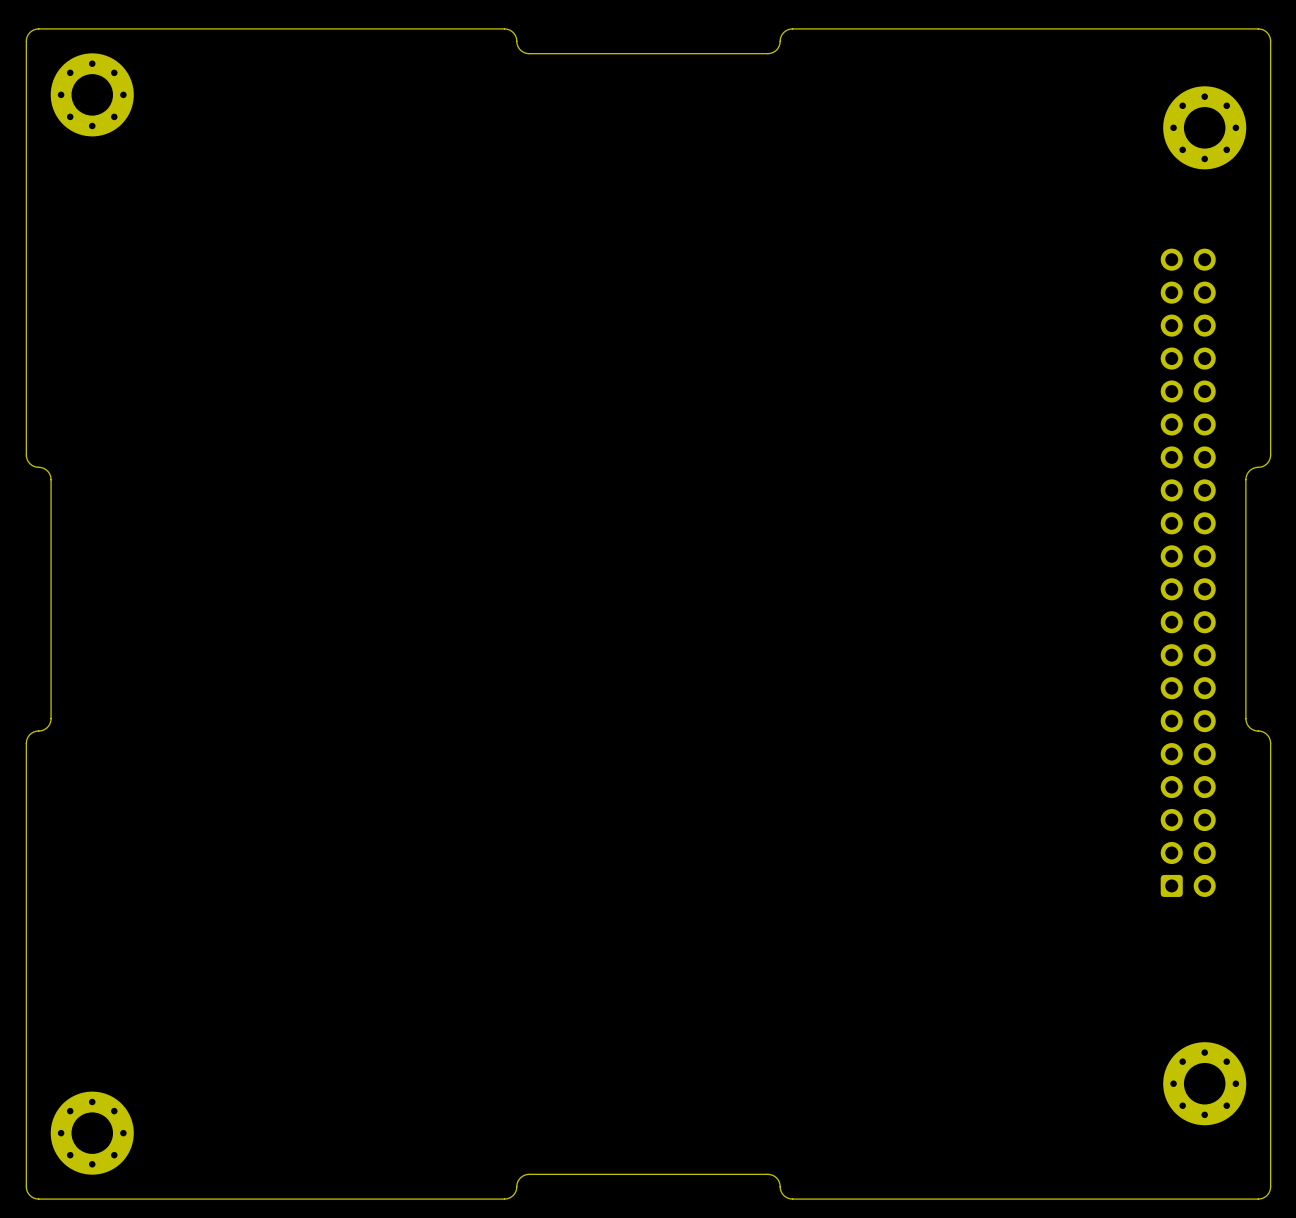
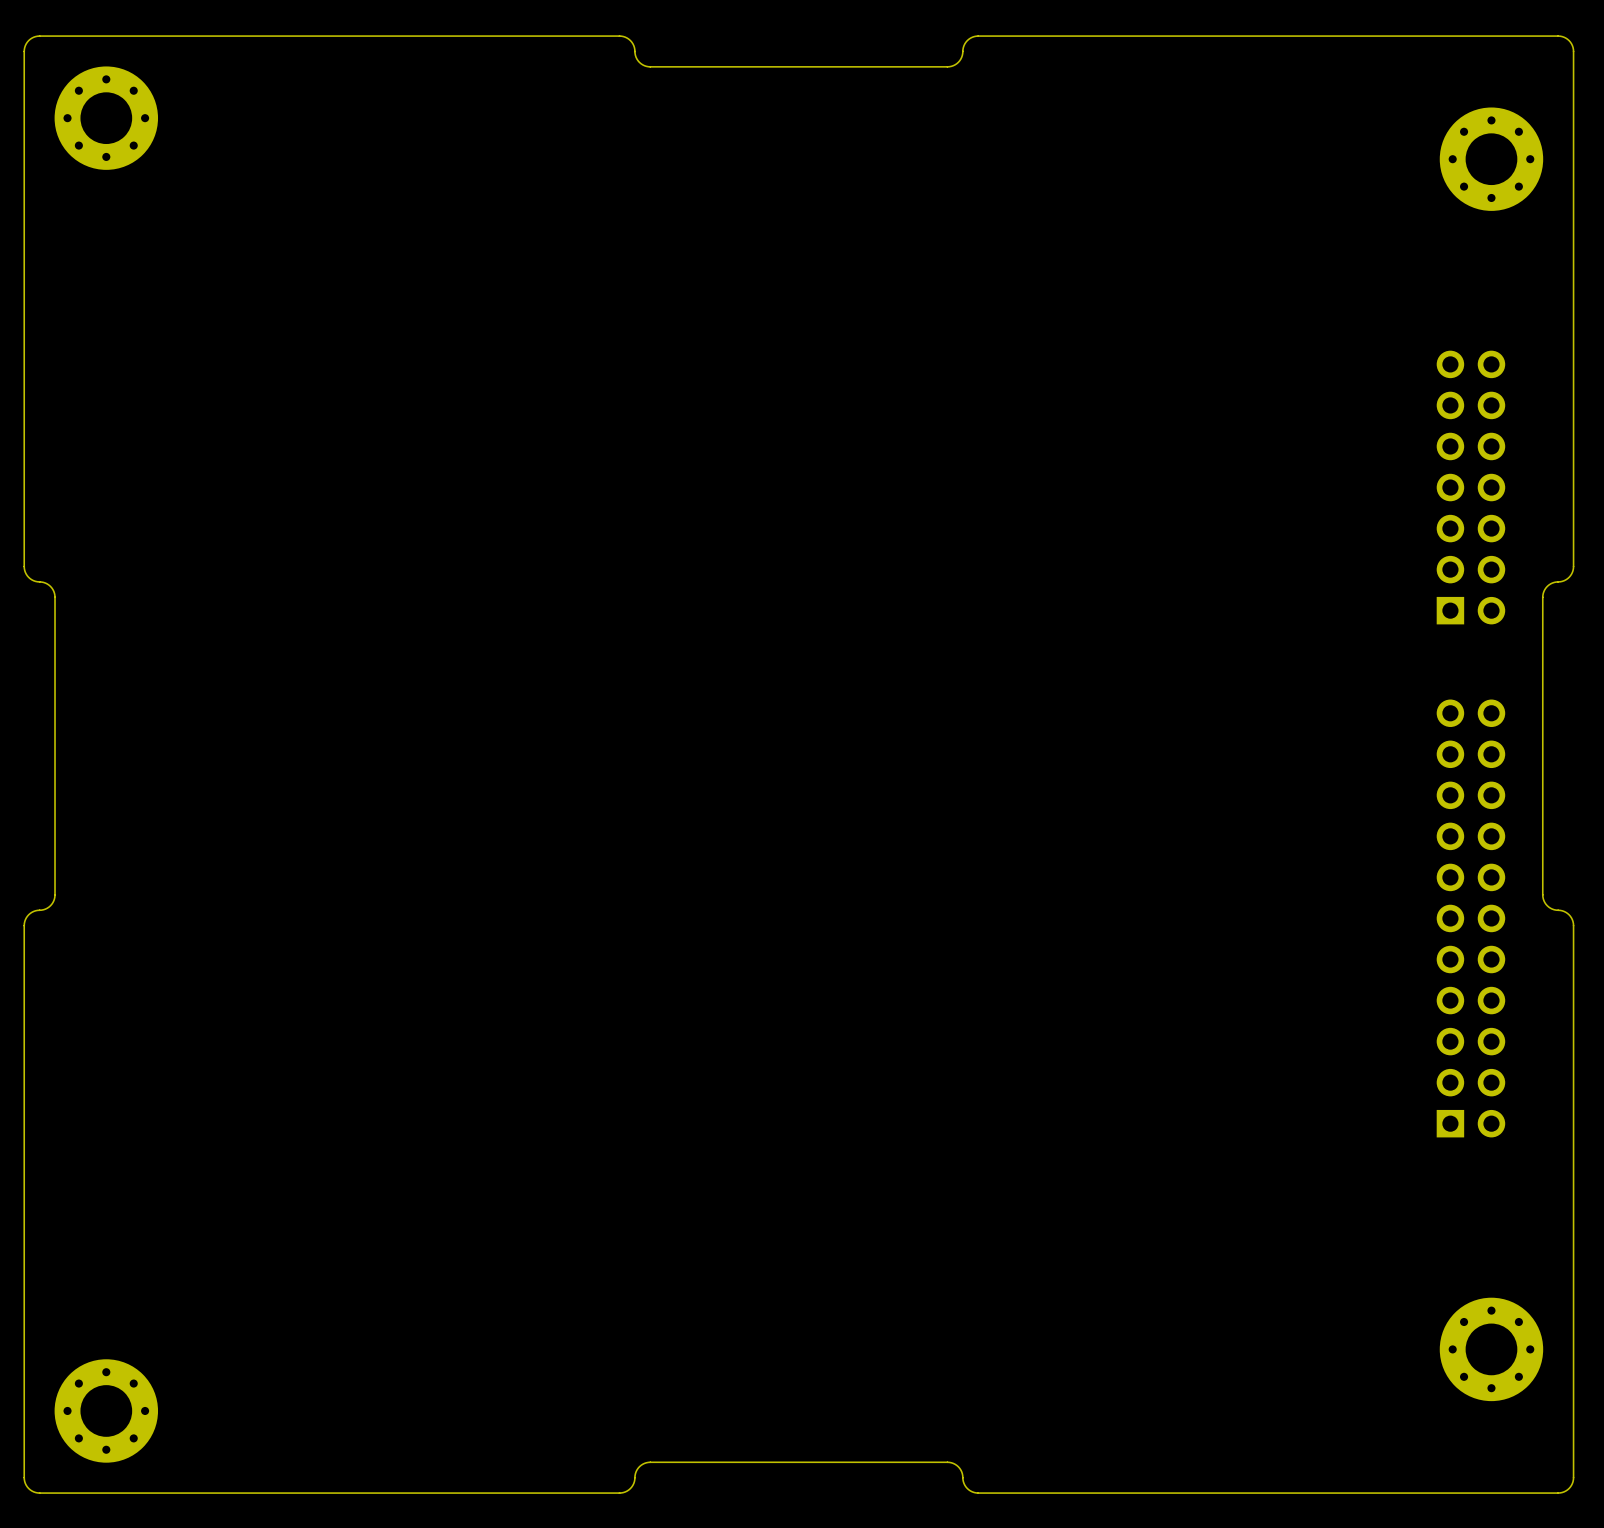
part: none -> (1470, 487)
part: (1188, 572) -> none
part: none -> (1470, 918)

